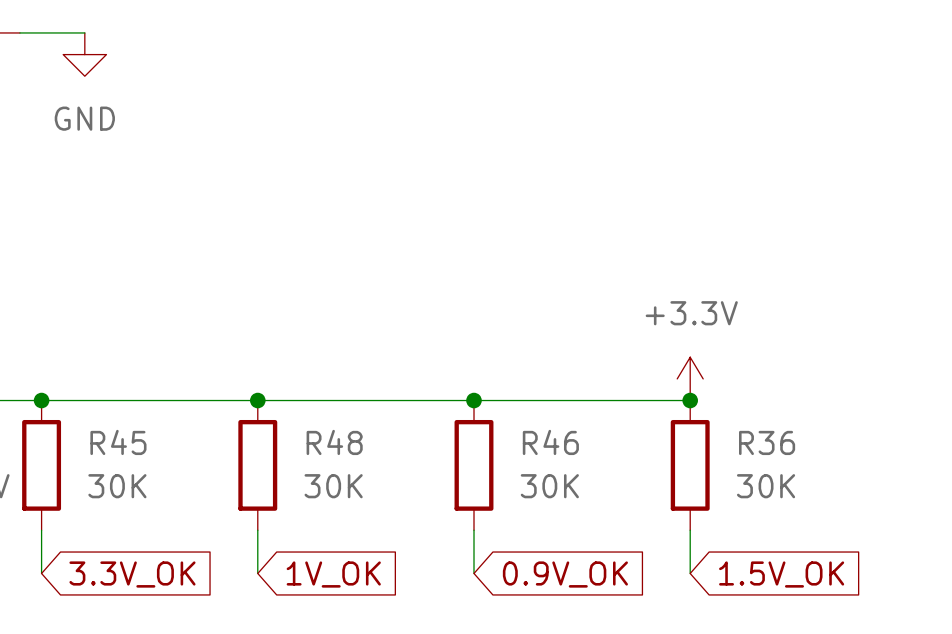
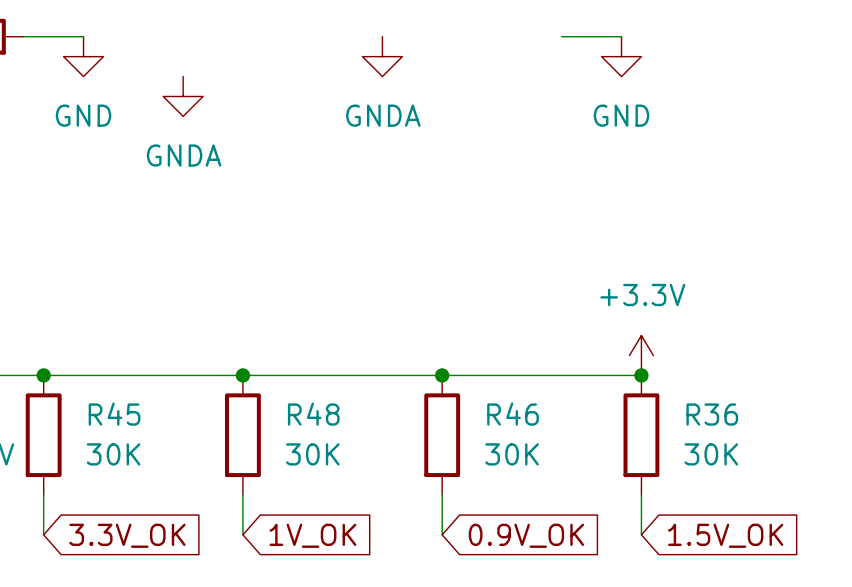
wire: none -> (561, 36) (621, 36)
power symbol: none -> GNDA (382, 56)
power symbol: none -> GND (621, 56)
power symbol: none -> GNDA (183, 96)

